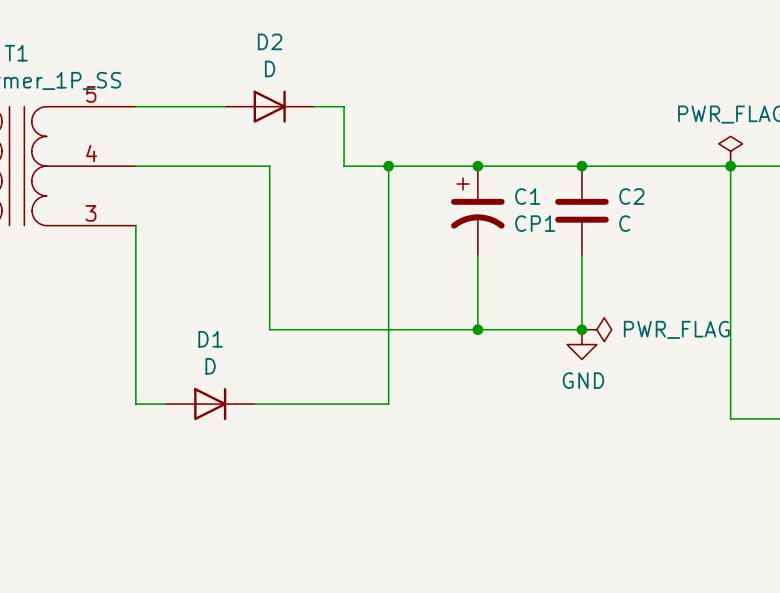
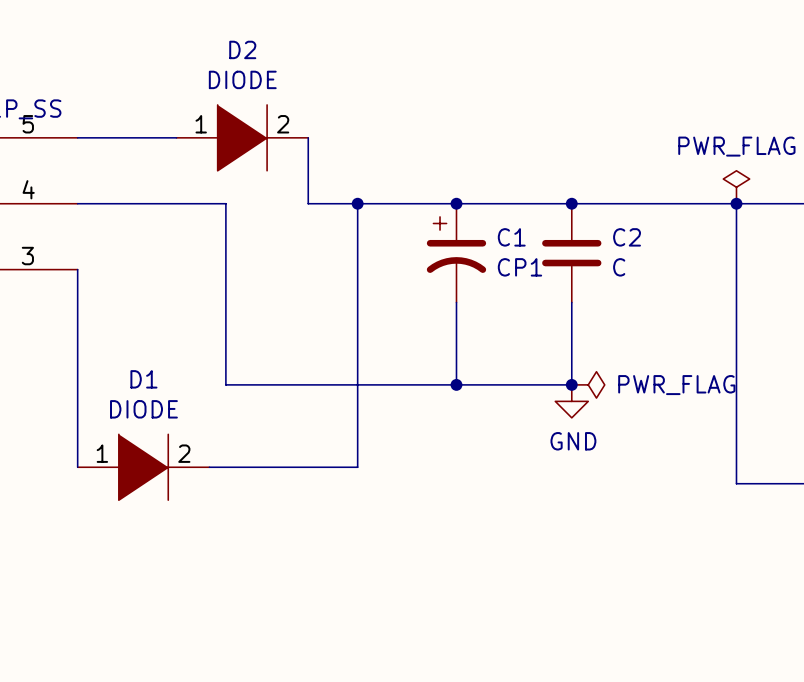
D2 value: D (270, 68) -> DIODE (242, 79)
D2 symbol: [225, 90, 315, 123] -> [176, 104, 309, 171]
D1 value: D (210, 366) -> DIODE (143, 409)
D1 symbol: [165, 388, 255, 421] -> [77, 434, 210, 501]

